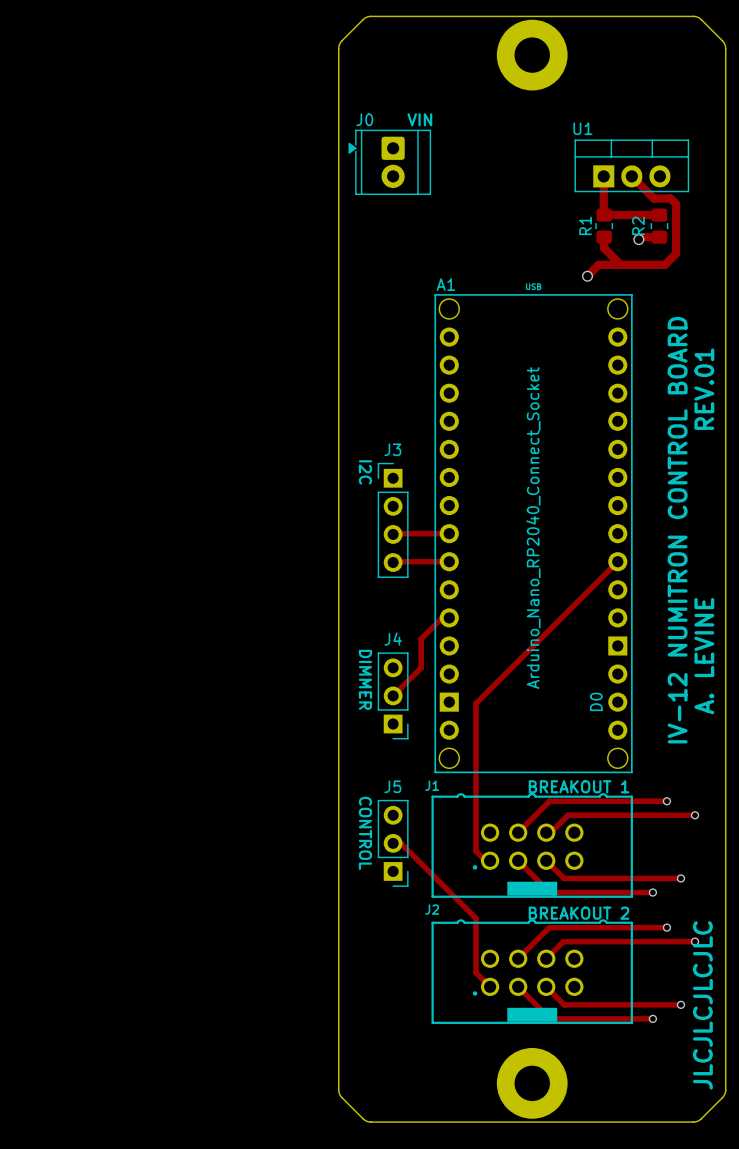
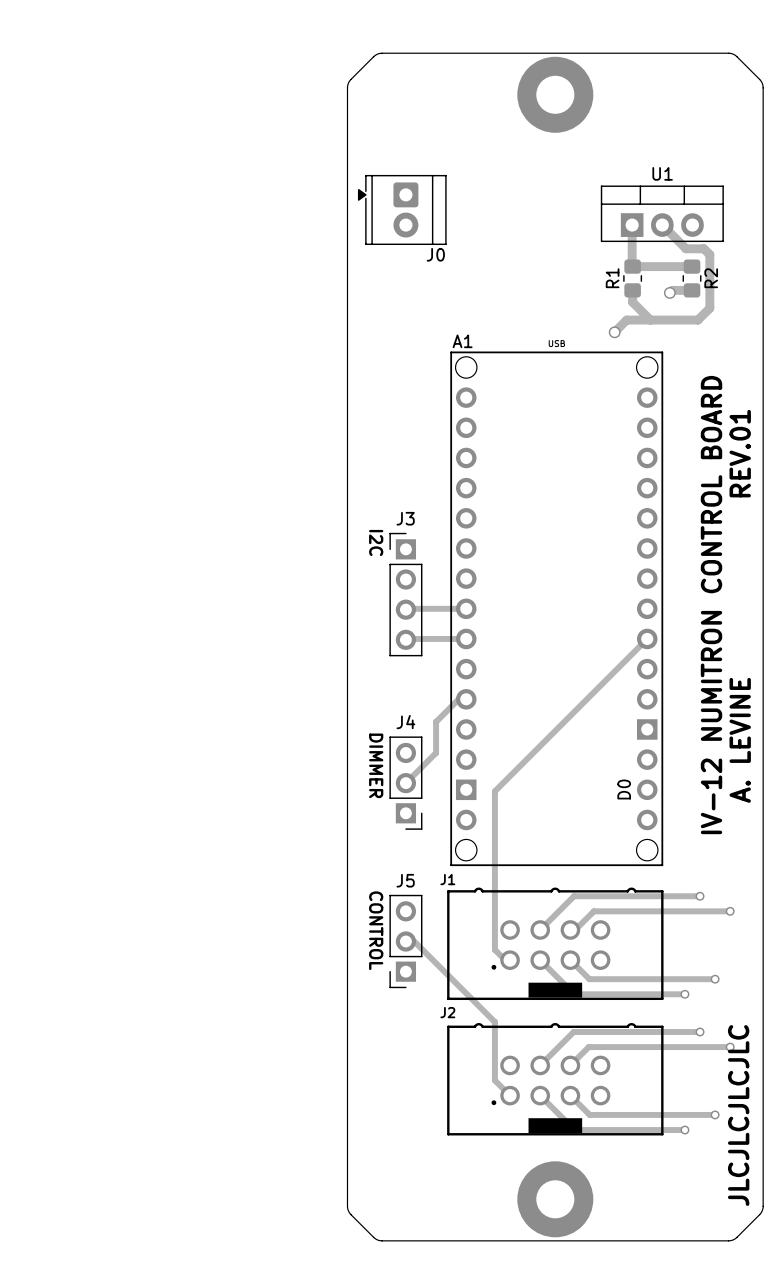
J0 name position: J0 (364, 119) -> J0 (435, 254)
text: VIN (419, 119) -> none
U1 name position: U1 (582, 128) -> U1 (662, 173)
R2 name position: R2 (638, 225) -> R2 (711, 278)
A1 value: Arduino_Nano_RP2040_Connect_Socket (533, 528) -> none
text: BREAKOUT 1 (579, 786) -> none
J5 footprint: [377, 799, 409, 887] -> [389, 894, 423, 989]
text: BREAKOUT 2 (579, 913) -> none

